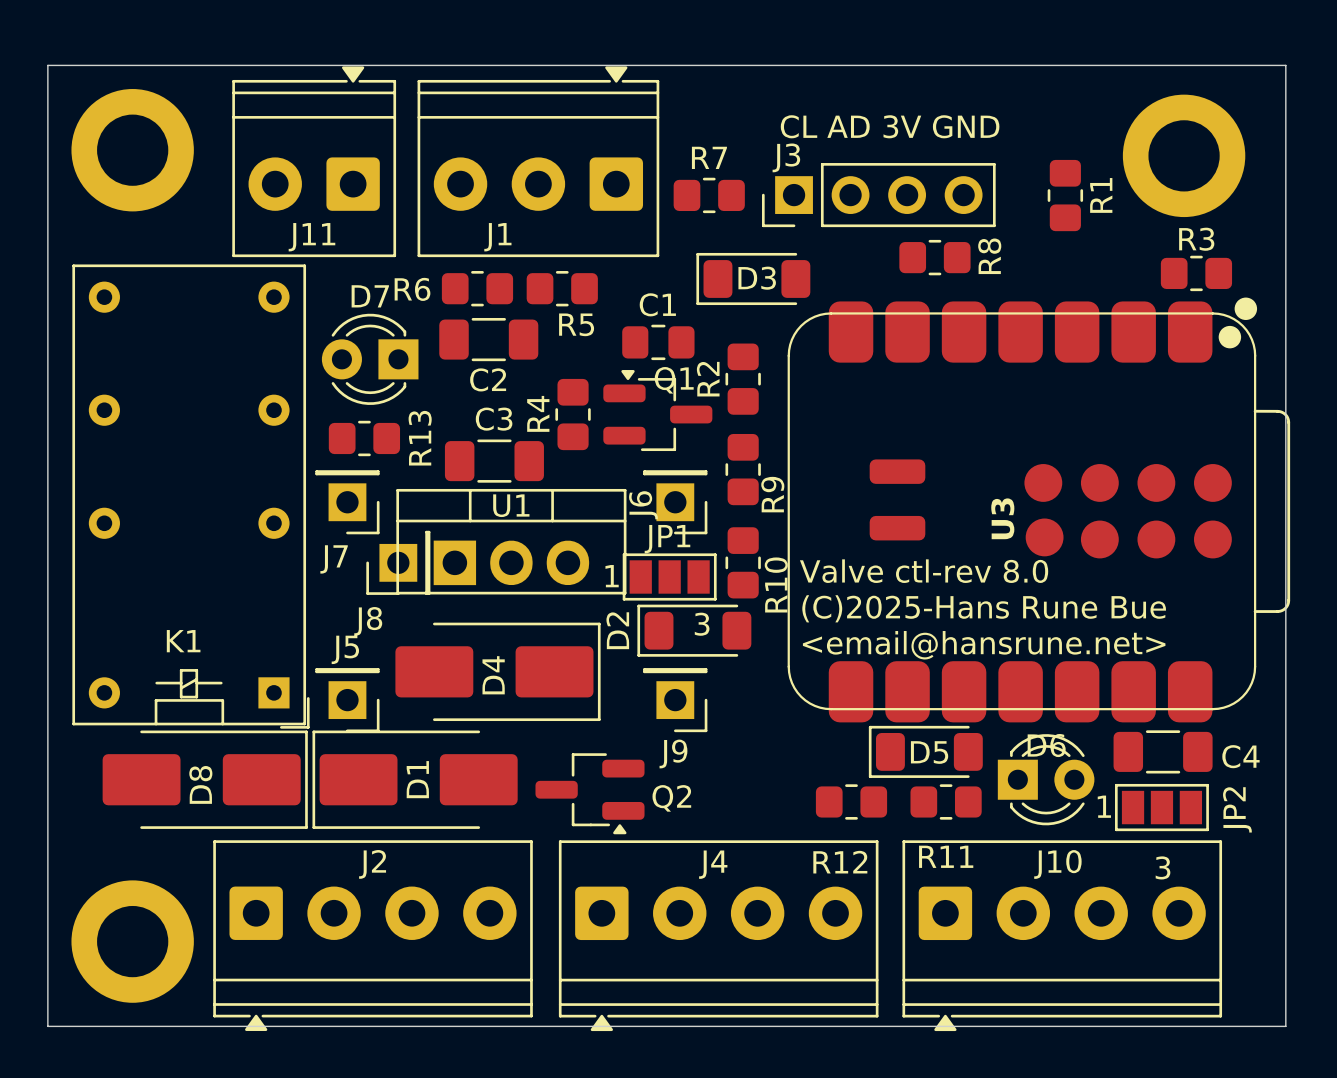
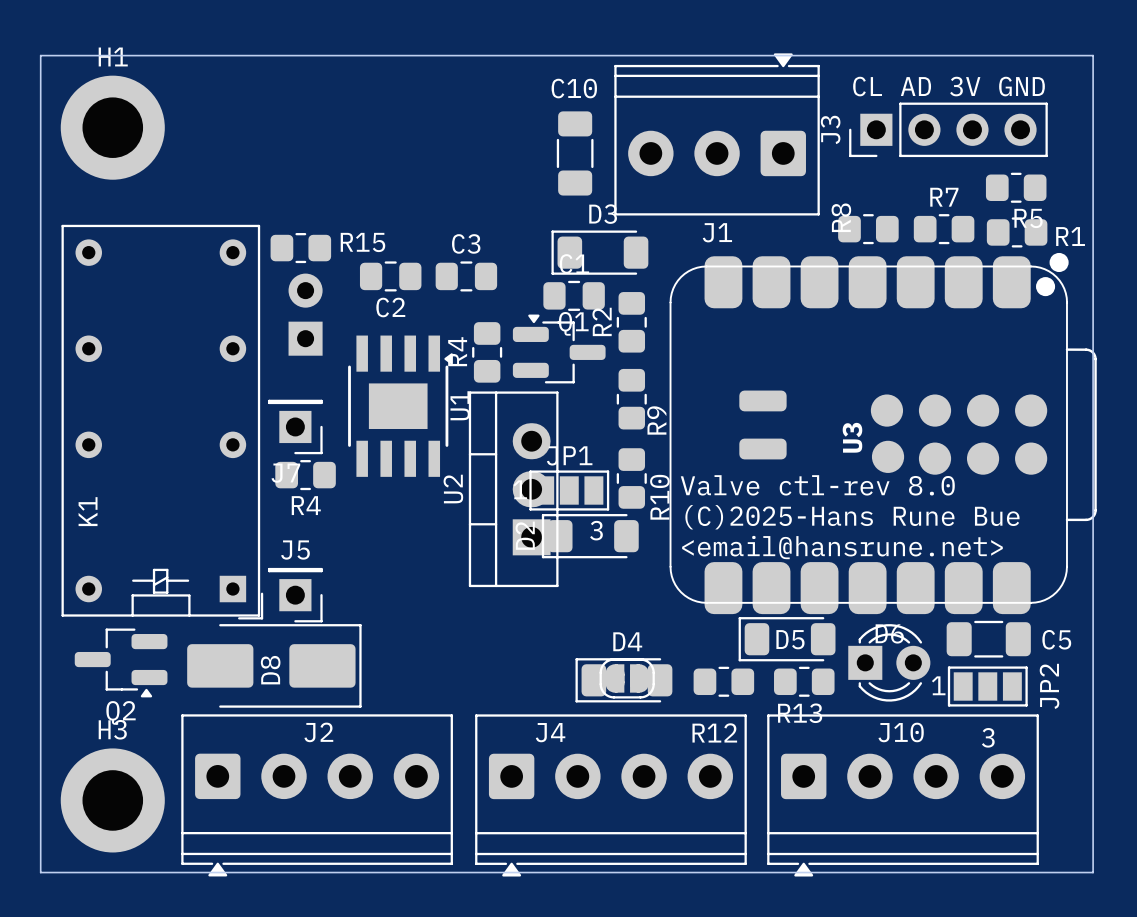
H1 name: none -> H1 (113, 56)
text position: CL AD 3V GND (890, 126) -> CL AD 3V GND (949, 86)
part: (1184, 155) -> none
J3 name rotation: 0° (786, 157) -> 90° counterclockwise (830, 129)
J3 name position: J3 (786, 157) -> J3 (830, 129)
J11: (314, 161) -> none
J1 position: (538, 161) -> (717, 134)
C10: none -> (575, 153)
R7 position: (709, 195) -> (944, 229)
J3 position: (878, 195) -> (948, 129)
R1: (1065, 195) -> none
J1 name position: J1 (497, 237) -> J1 (717, 232)
R3 name: R3 (1196, 239) -> R1 (1070, 236)
R8 position: (934, 257) -> (868, 229)
D3 position: (753, 278) -> (599, 252)
D3 name position: D3 (757, 278) -> D3 (603, 214)
R6: (477, 288) -> none
R5 position: (562, 288) -> (1016, 187)
R15: none -> (300, 248)
C2 footprint: [439, 317, 539, 362] -> [359, 261, 422, 292]
C1 position: (658, 342) -> (574, 295)
D7 side: top (370, 359) -> bottom (305, 314)
R13: (364, 438) -> none
C3 footprint: [444, 439, 544, 483] -> [435, 261, 498, 292]
U1 footprint: [396, 488, 627, 595] -> [348, 335, 453, 477]
J6: (675, 502) -> none
U1 name position: U1 (511, 505) -> U1 (460, 405)
R4: none -> (305, 475)
J8: (398, 562) -> none
U2: none -> (513, 489)
D4 footprint: [395, 622, 601, 722] -> [575, 658, 673, 703]
K1 name rotation: 0° (183, 641) -> 90° counterclockwise (88, 511)
K1 name position: K1 (183, 641) -> K1 (88, 511)
D4 name position: D4 (493, 675) -> D4 (627, 641)
J9: (675, 700) -> none
C4 name: C4 (1240, 756) -> C5 (1056, 639)
D8 position: (205, 779) -> (274, 665)
D1: (415, 779) -> none
Q2 position: (590, 793) -> (121, 662)
Q2 name position: Q2 (671, 798) -> Q2 (121, 712)
part: none -> (627, 678)
R11 name: R11 (946, 856) -> R13 (800, 713)
H3 name: none -> H3 (112, 729)
J4 name position: J4 (713, 864) -> J4 (550, 732)

